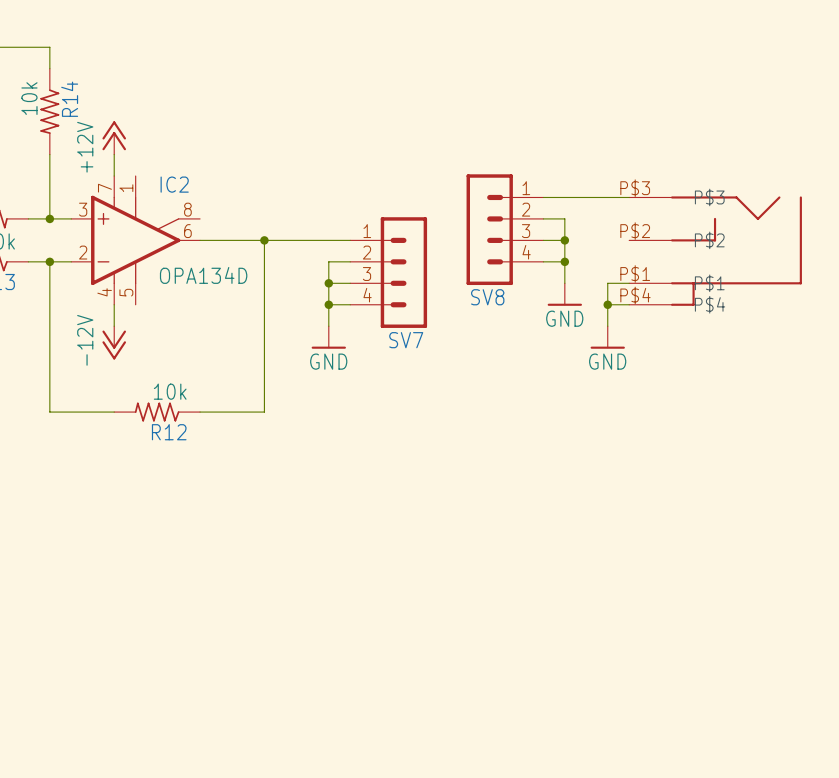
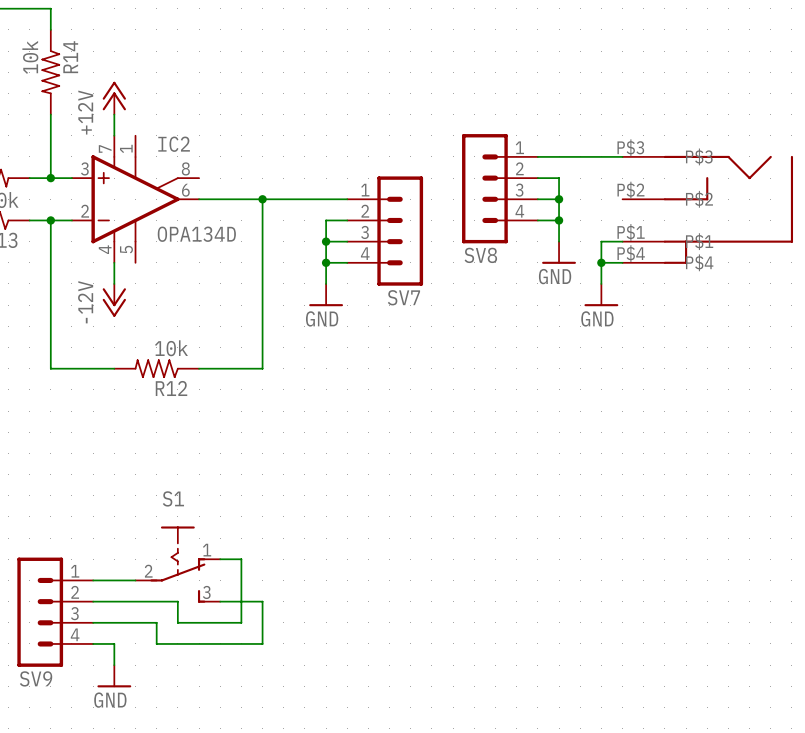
wire: none -> (220, 559) (241, 559) (241, 622) (177, 622) (177, 601) (93, 601)
S1: none -> (177, 564)
wire: none -> (93, 580) (135, 580)
wire: none -> (220, 601) (262, 601) (262, 643) (156, 643) (156, 622) (93, 622)
SV9: none -> (55, 612)
wire: none -> (93, 643) (114, 643) (114, 665)
power symbol: none -> GND (114, 676)

